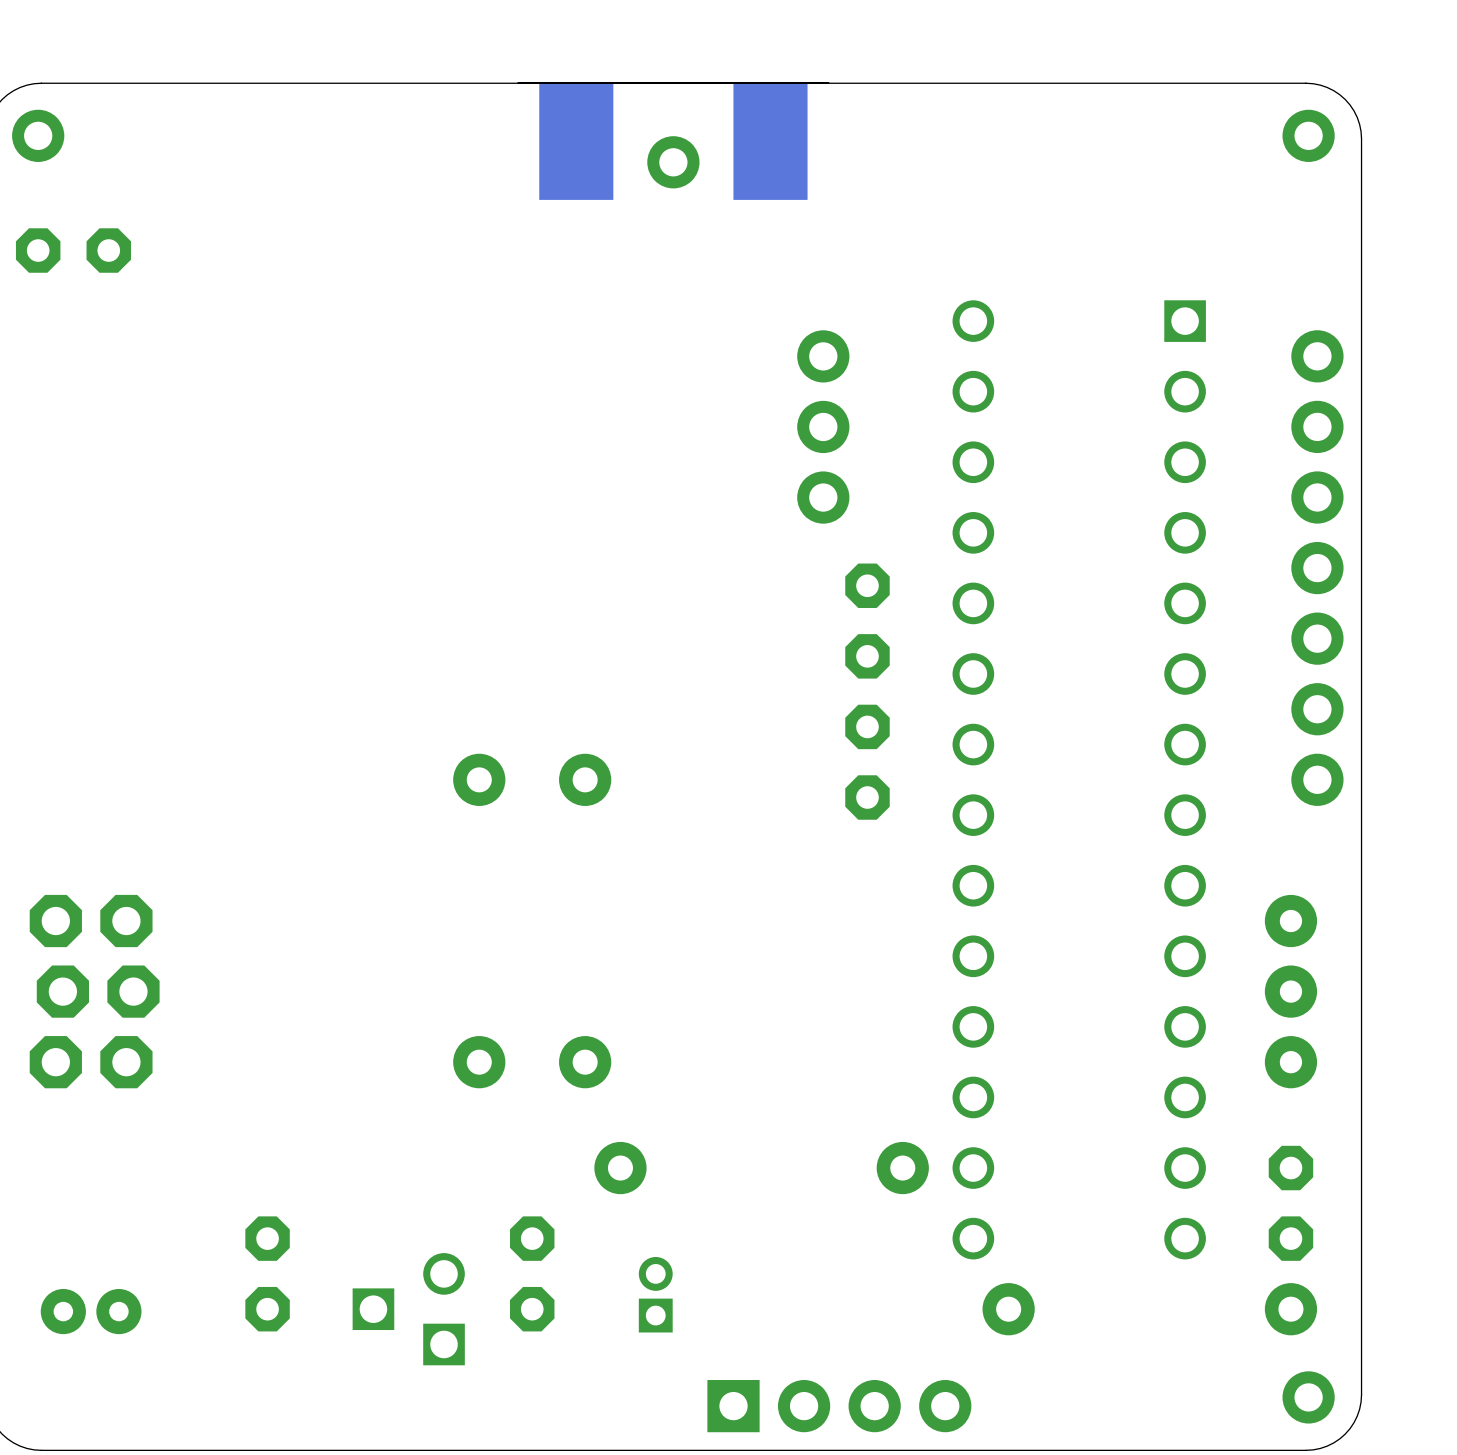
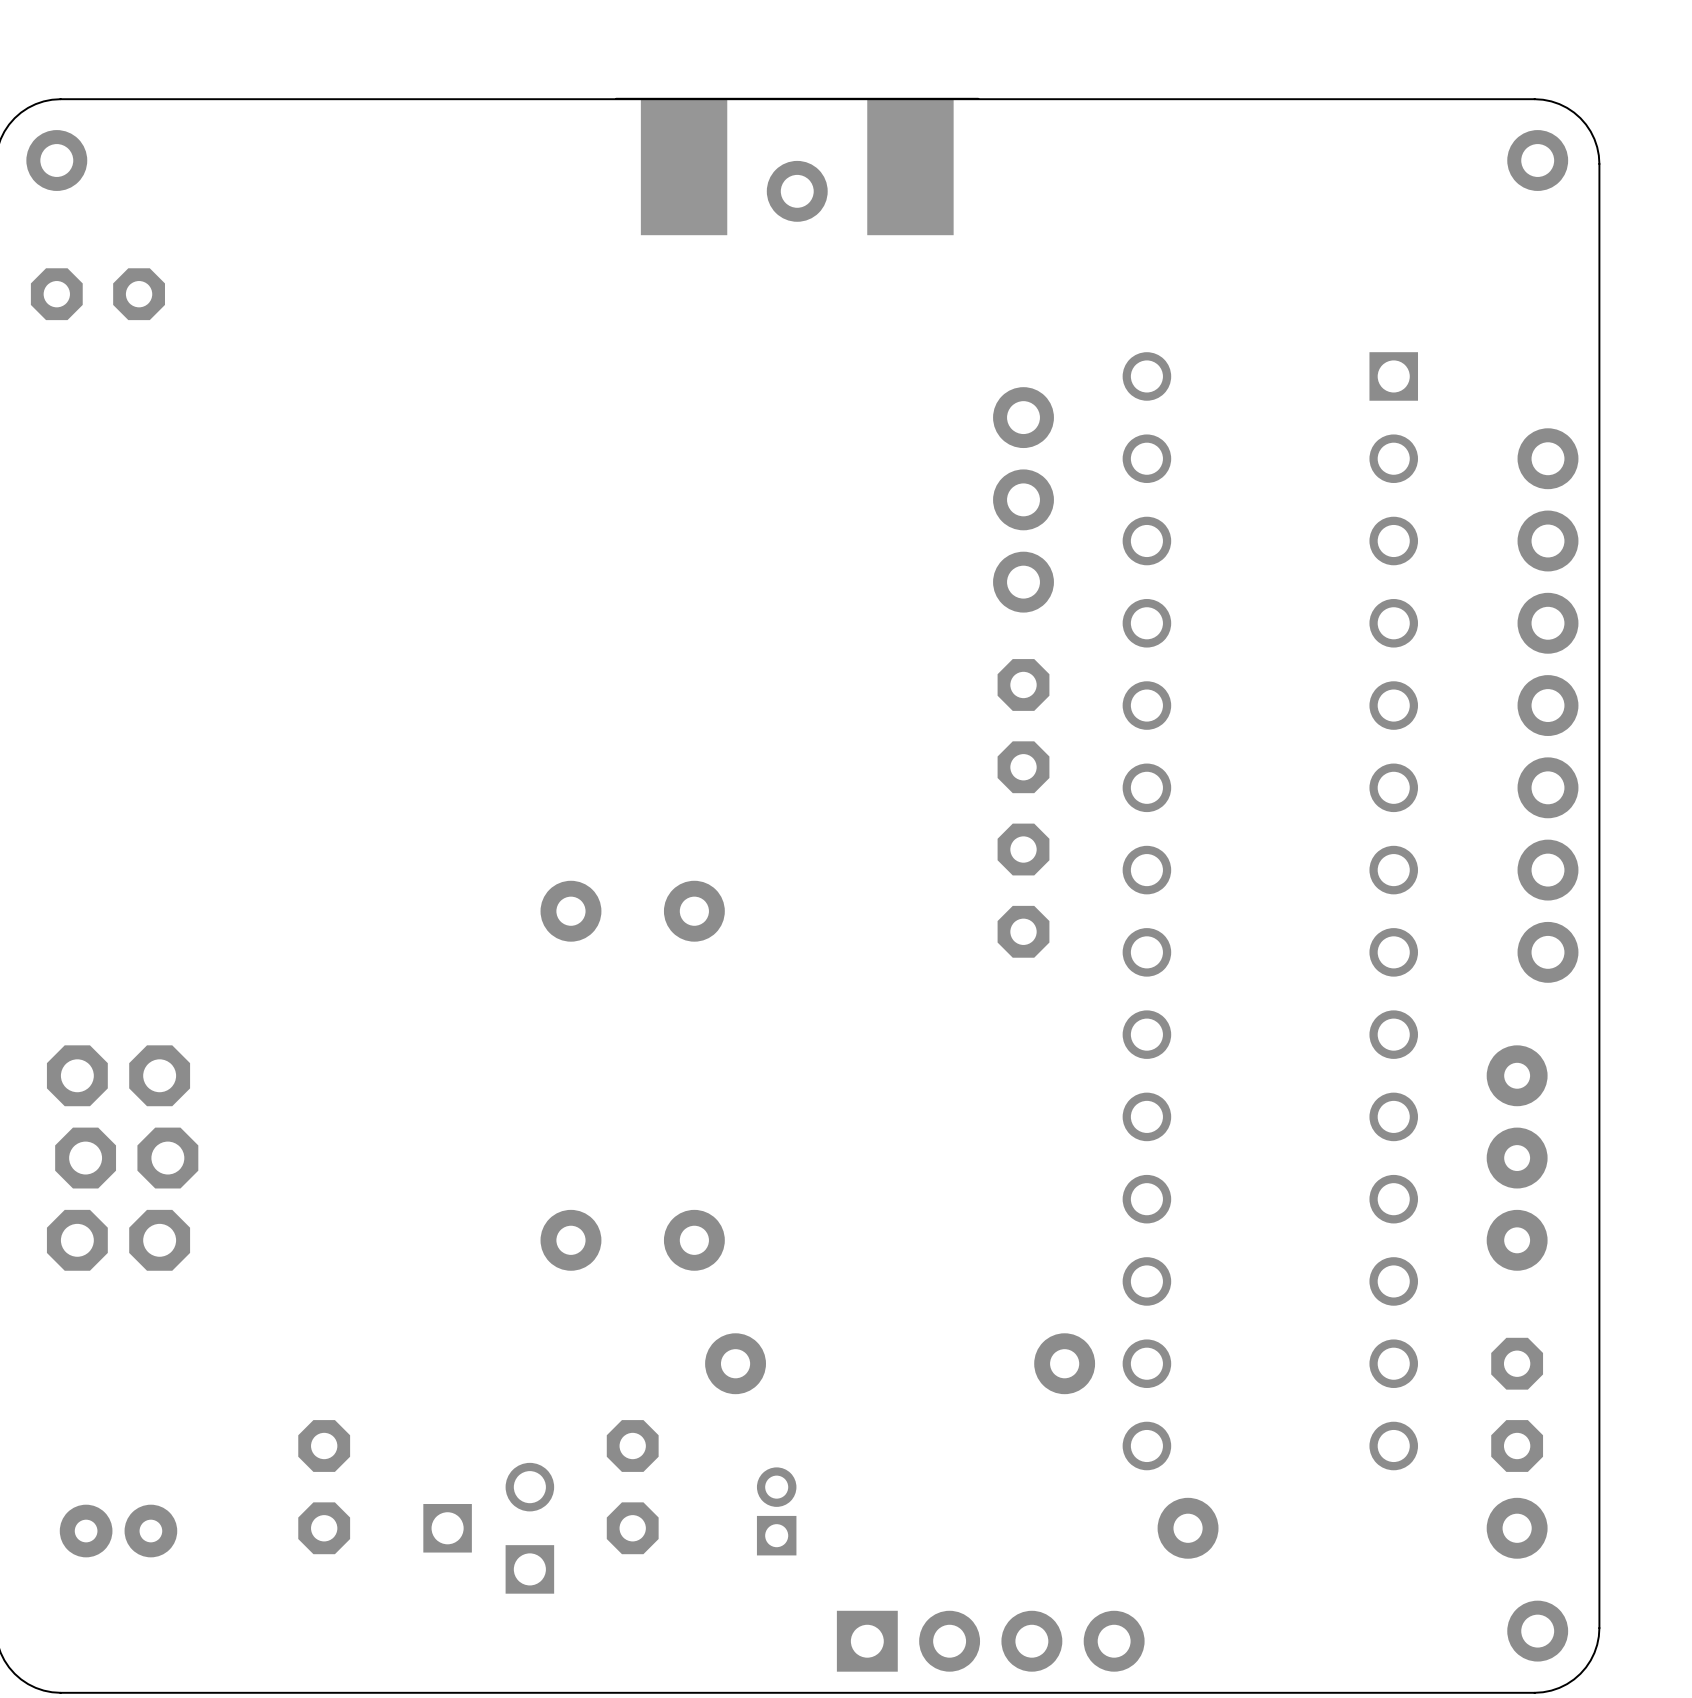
part position: (823, 426) -> (1023, 499)
part position: (1317, 568) -> (1547, 705)

